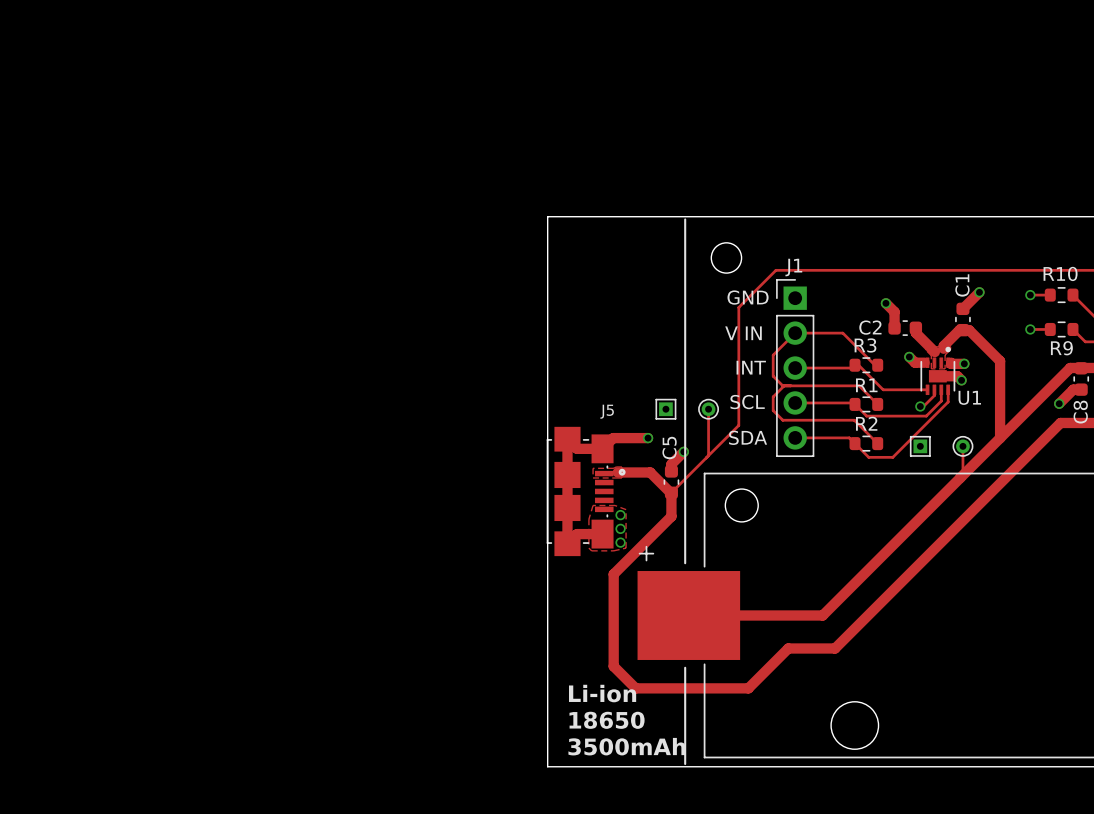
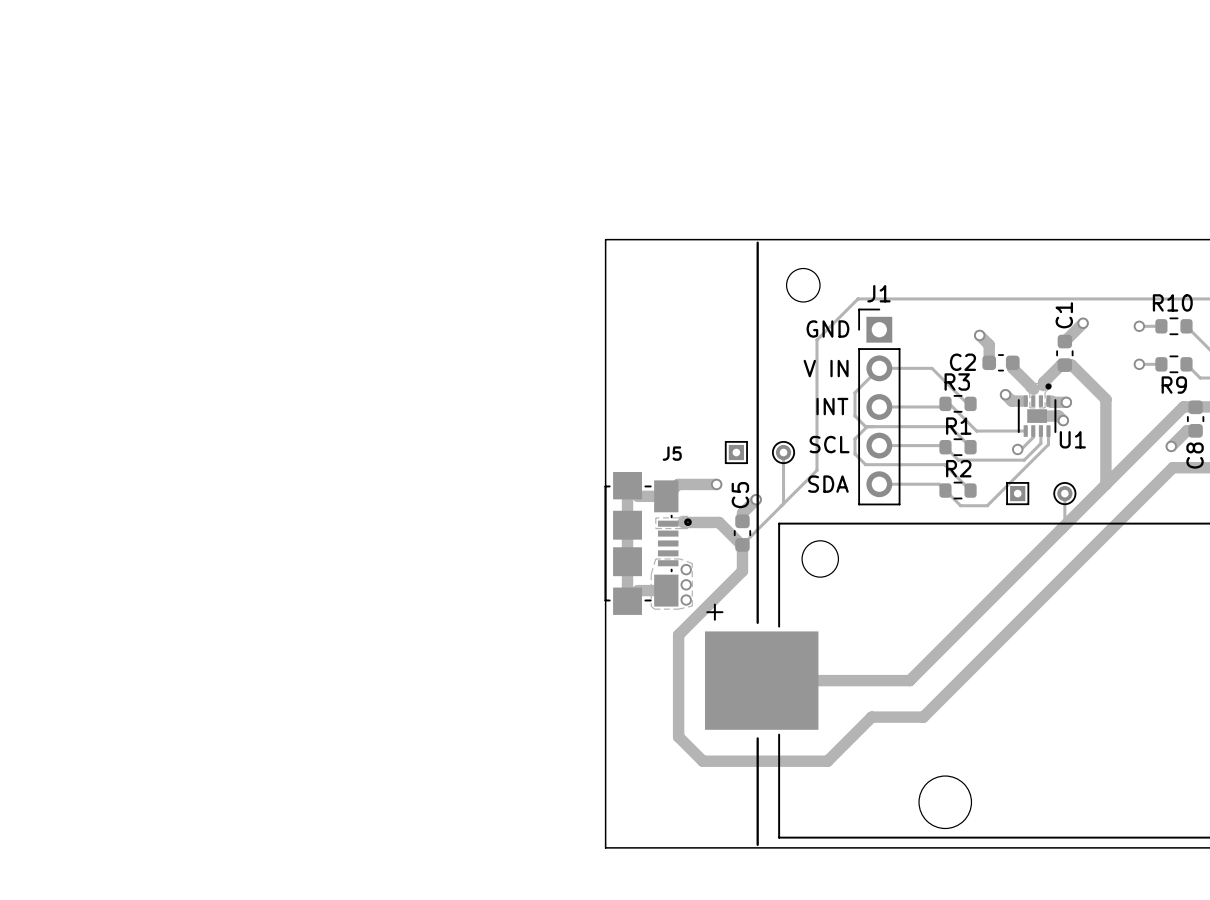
text: Li-ion (602, 693) -> none
text: 18650 (607, 720) -> none
text: 3500mAh (626, 746) -> none

